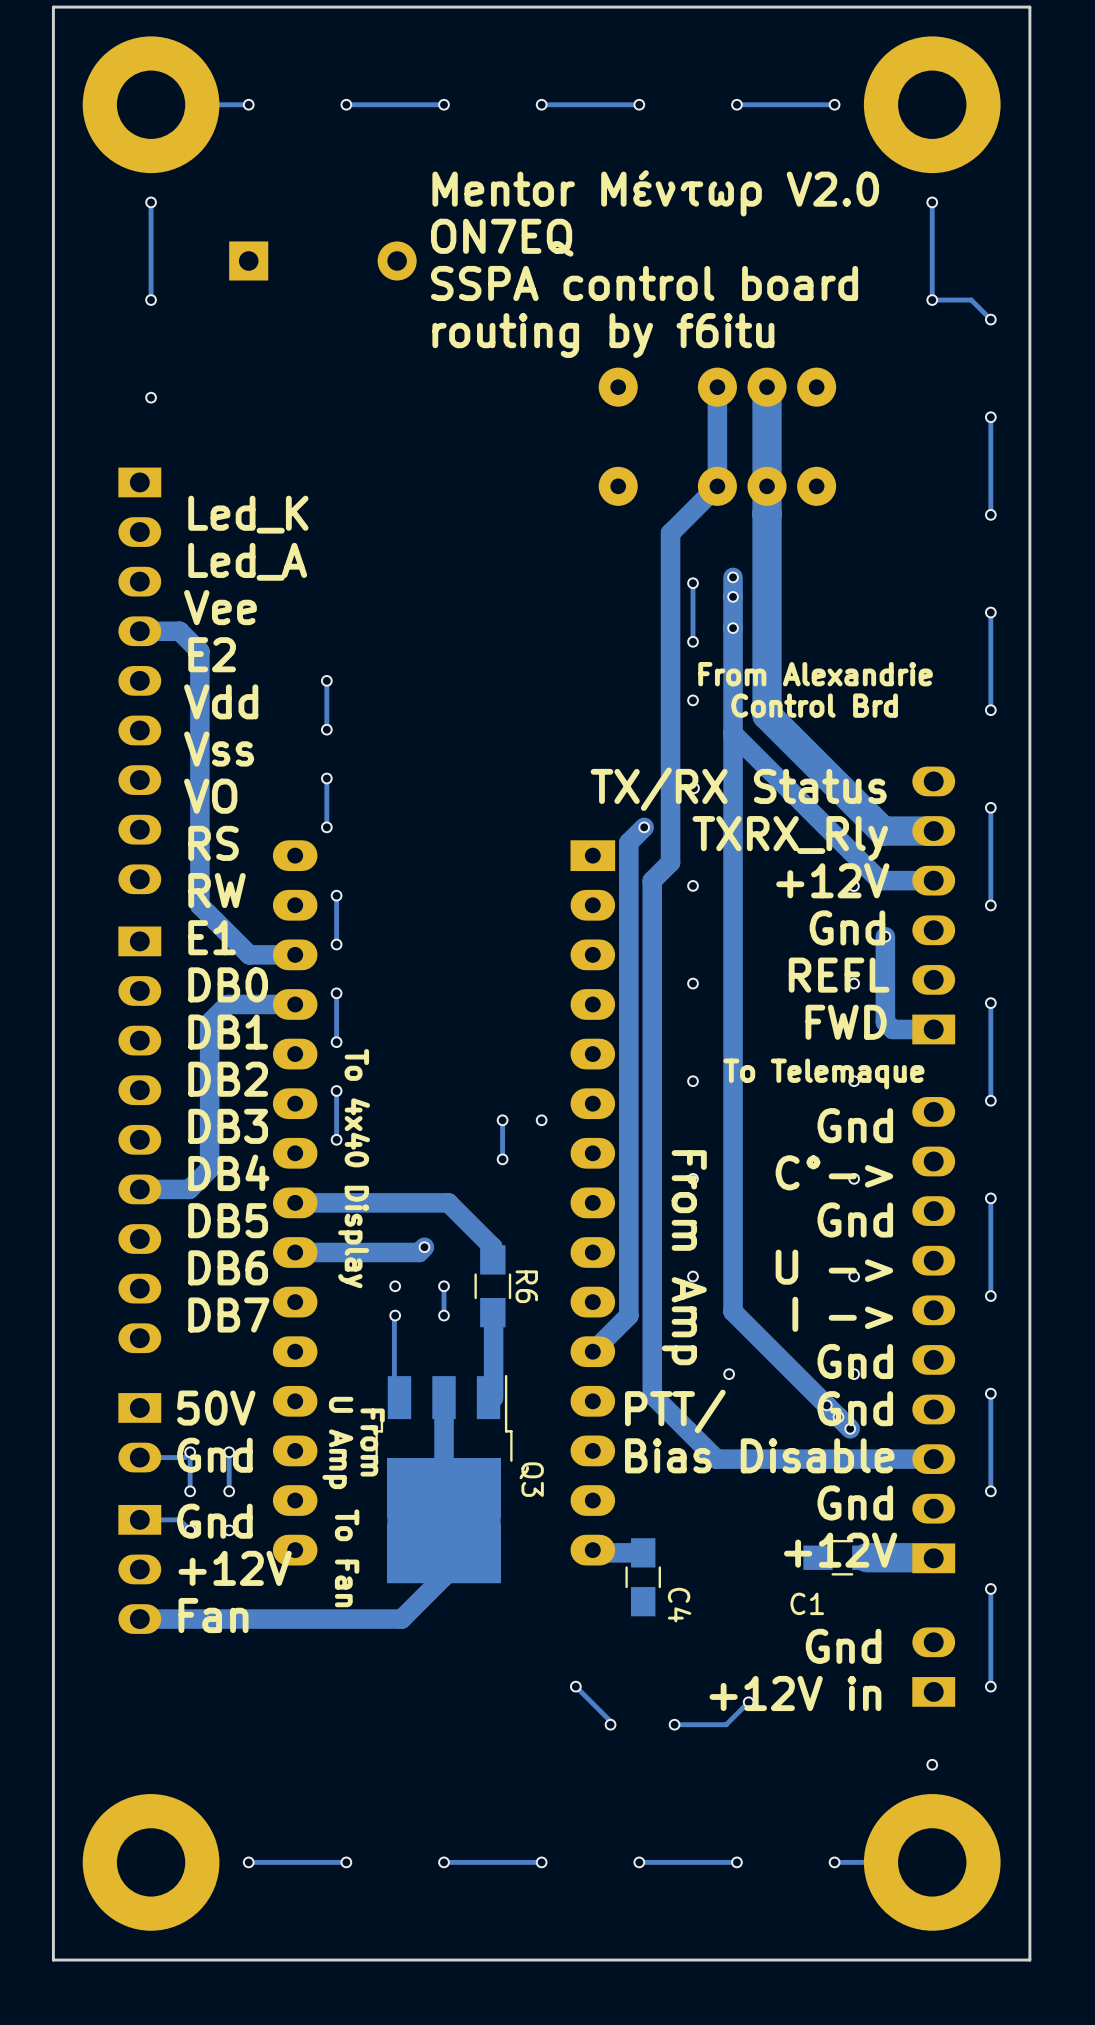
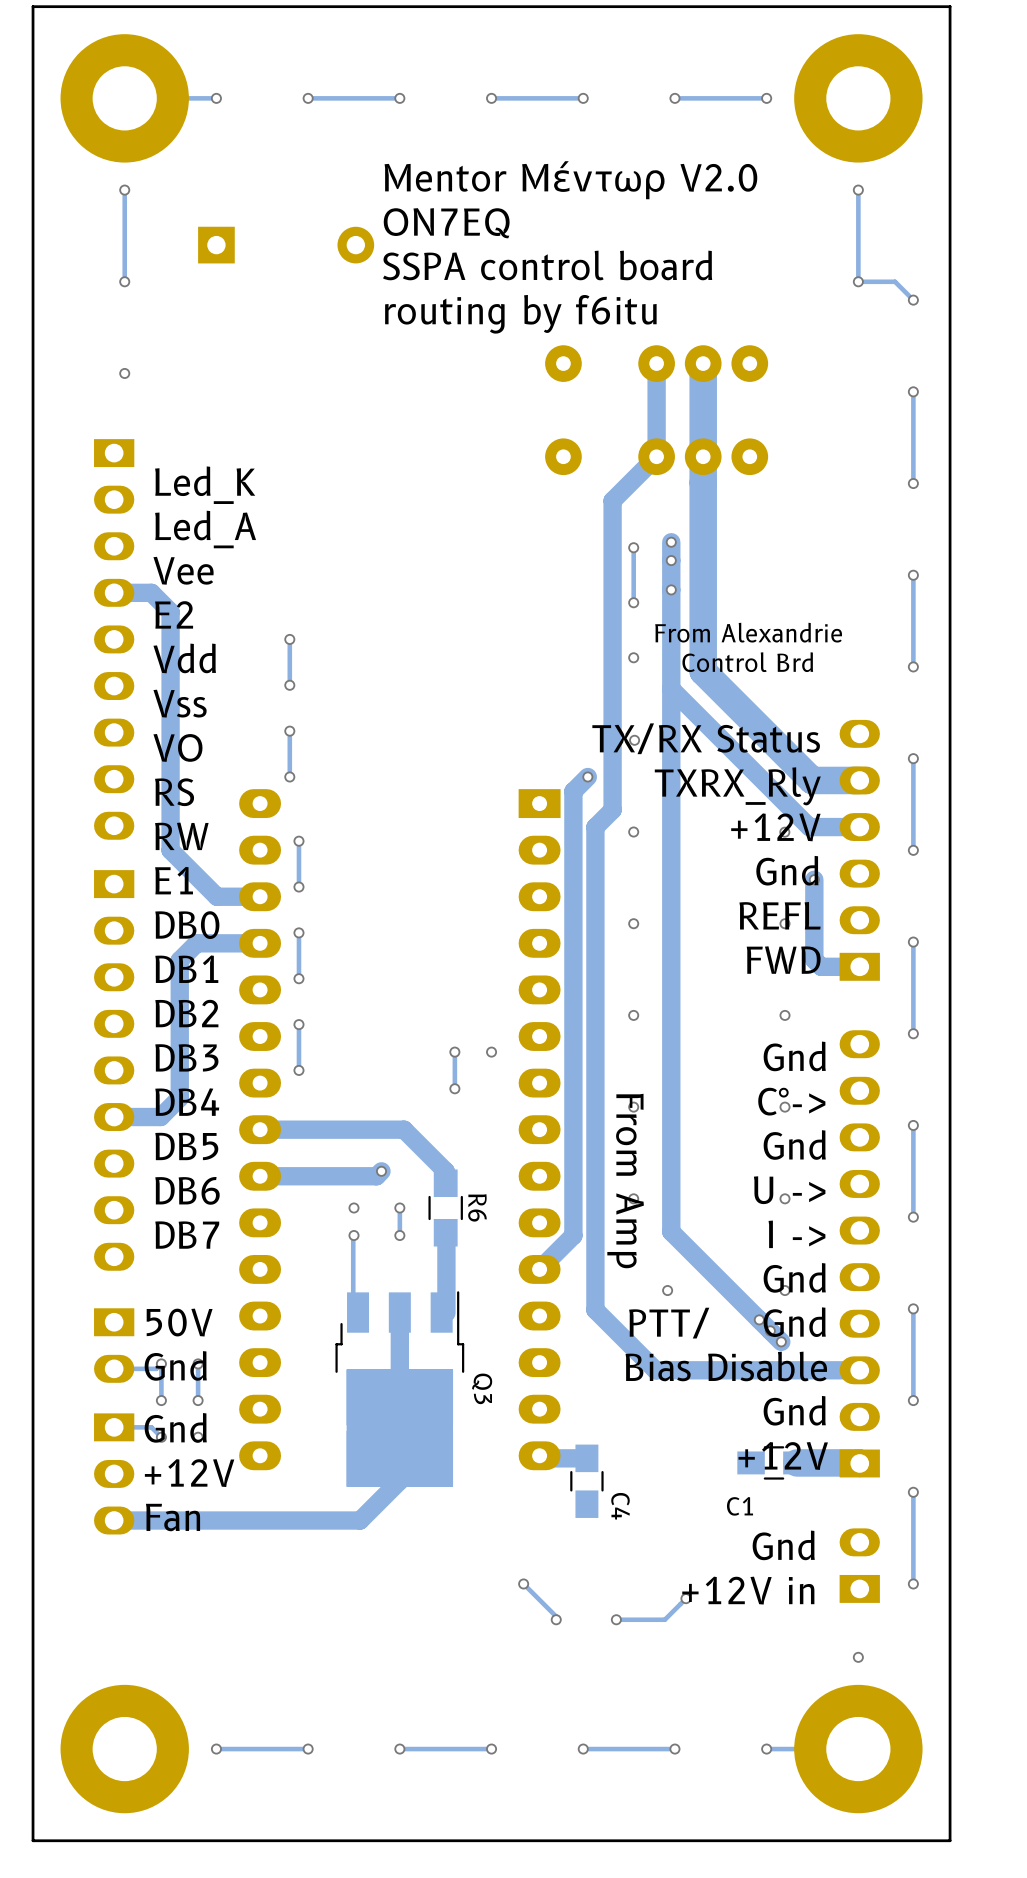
text: To Telemaque (823, 1073) -> none
text: To 4x40 Display (354, 1168) -> none
text: U Amp (337, 1442) -> none
text: From (372, 1442) -> none
text: To Fan (347, 1558) -> none

